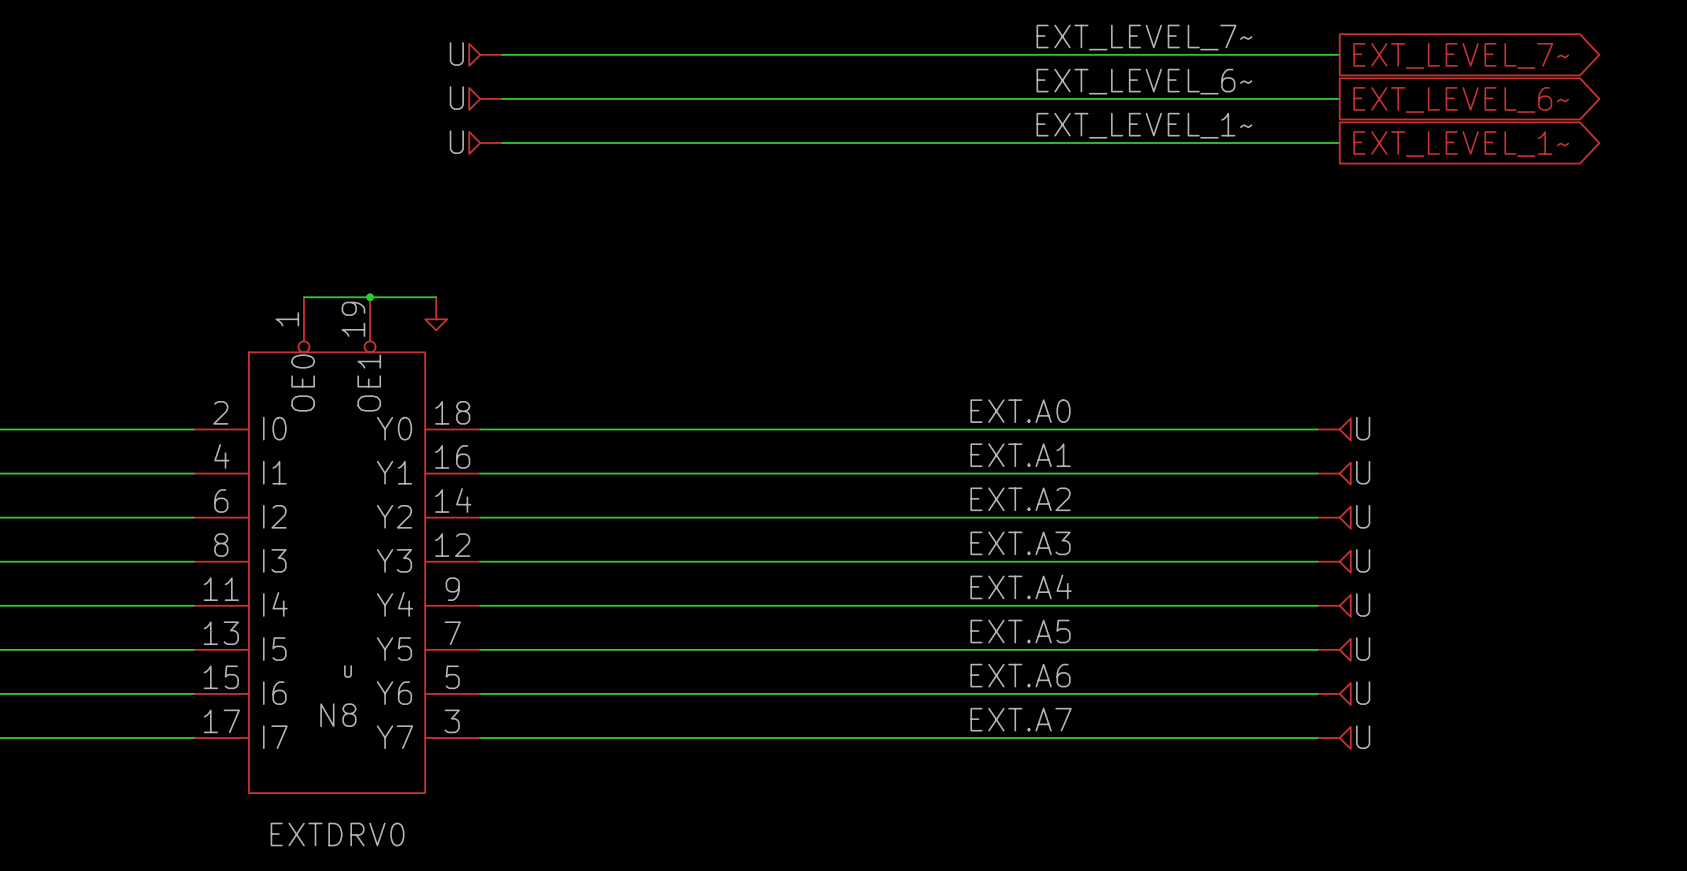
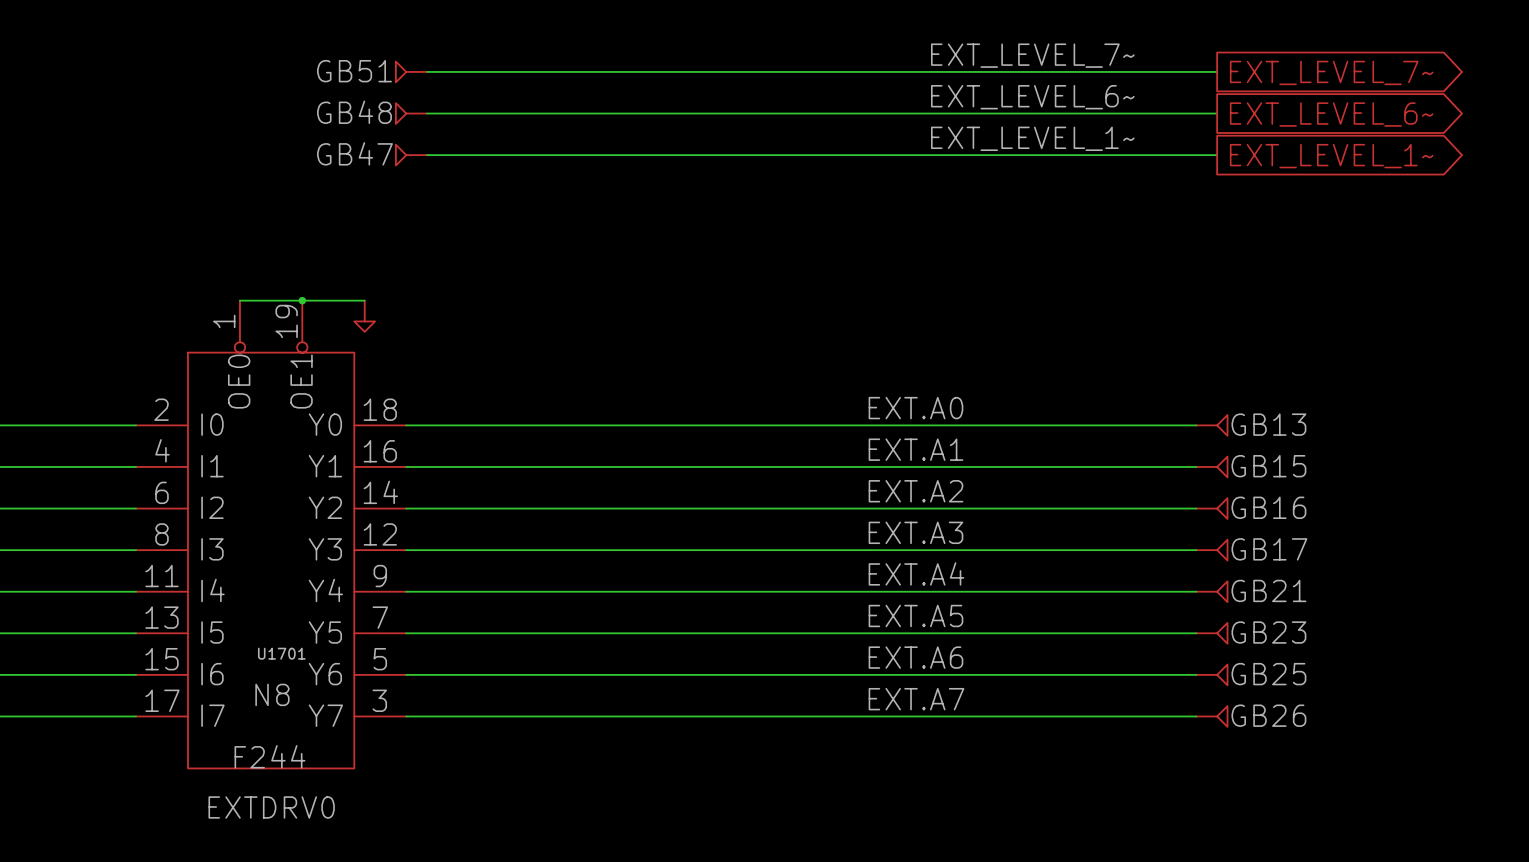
U name: U (456, 54) -> GB51 (354, 71)
U name: U (456, 98) -> GB48 (354, 112)
U name: U (456, 142) -> GB47 (354, 153)
U name: U (1363, 428) -> GB13 (1268, 424)
U name: U (1363, 472) -> GB15 (1268, 466)
U name: U (1363, 516) -> GB16 (1268, 507)
U name: U (1363, 560) -> GB17 (1269, 549)
U name: U (1363, 604) -> GB21 (1268, 590)
U name: U (1363, 649) -> GB23 (1268, 632)
U name: U (348, 671) -> U1701 (281, 653)
U name: U (1363, 693) -> GB25 (1268, 674)
U name: U (1363, 737) -> GB26 (1268, 715)
U value: none -> F244 (269, 756)

